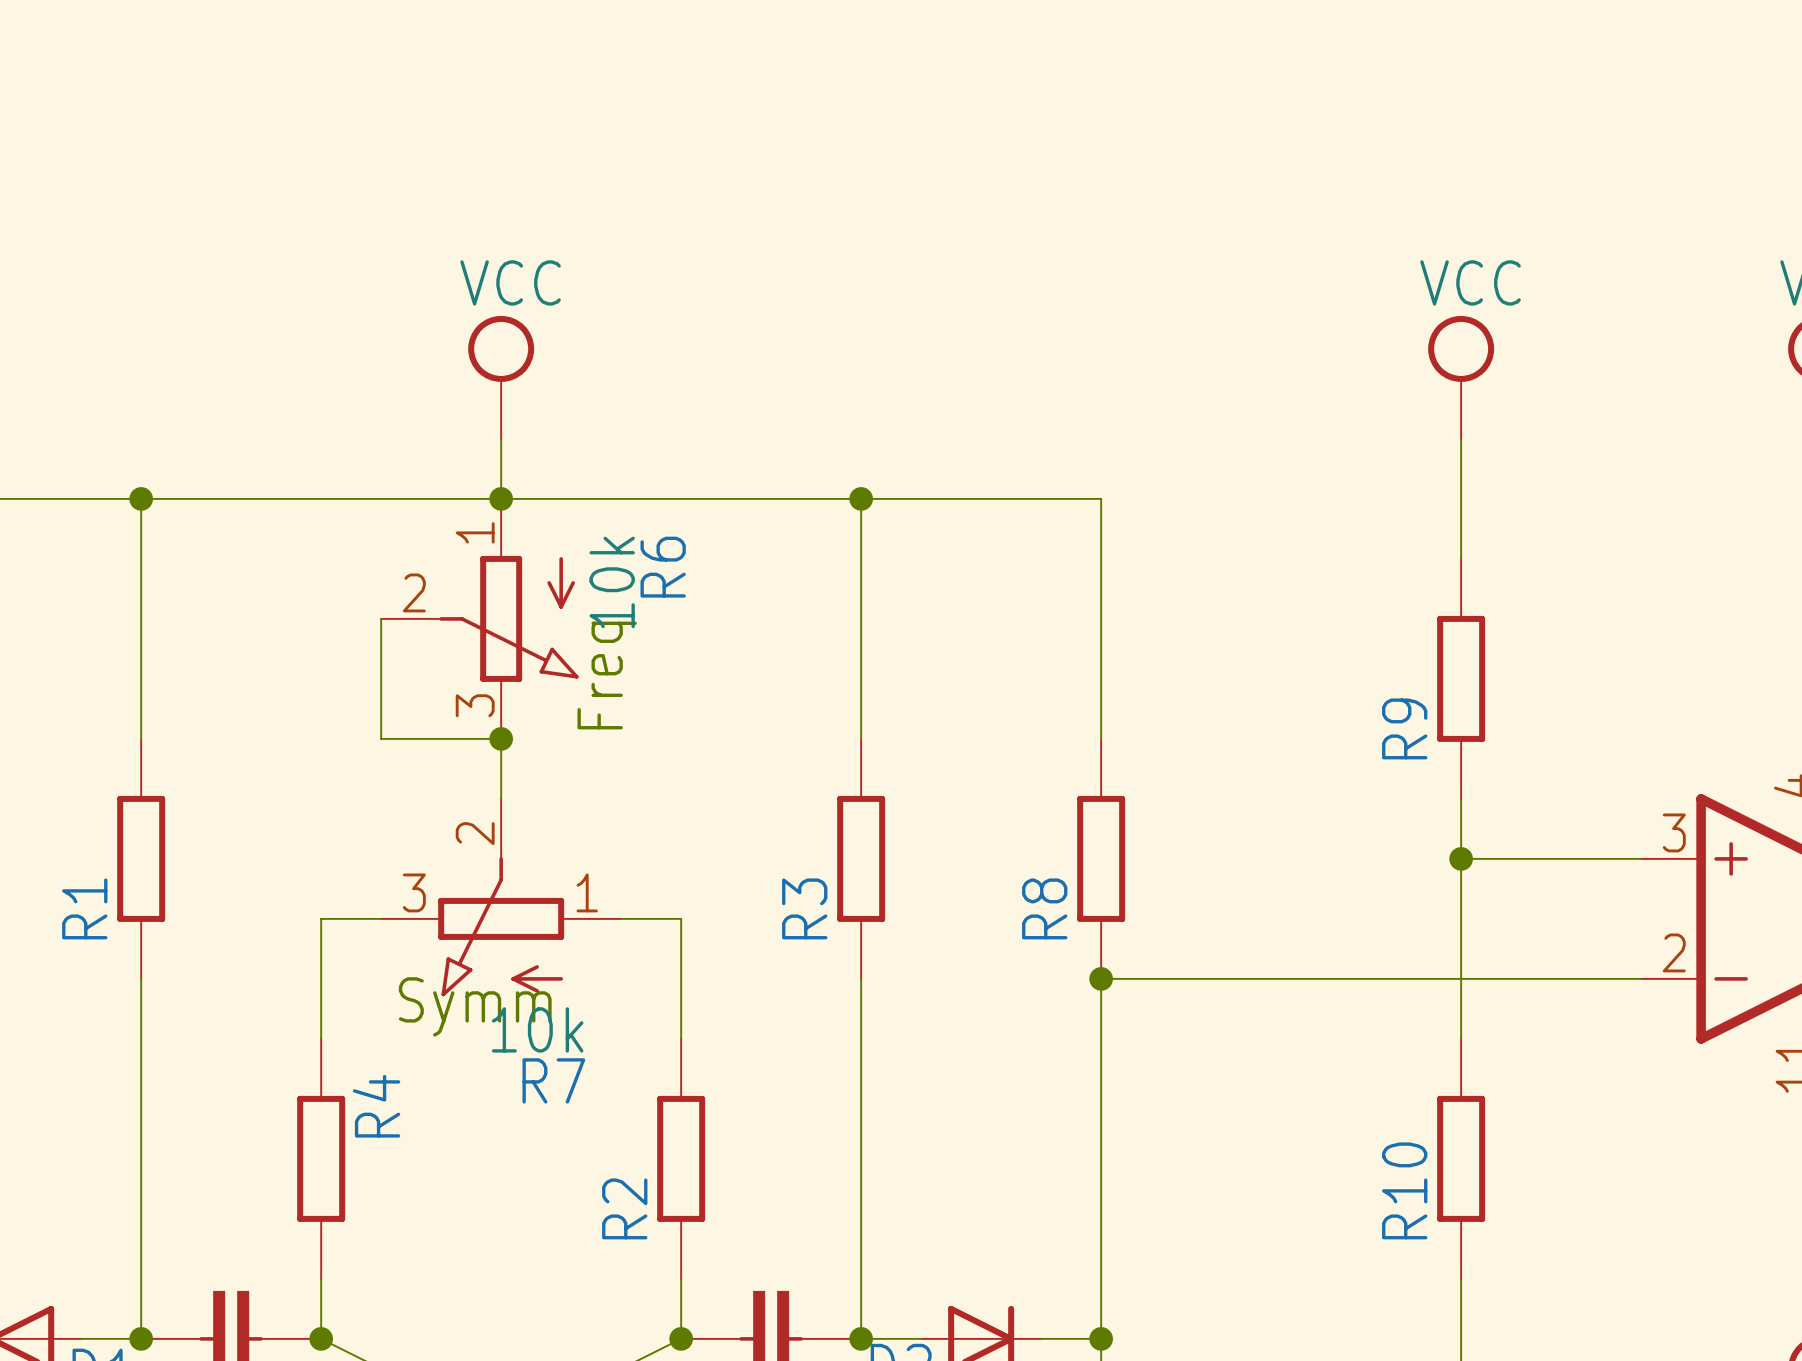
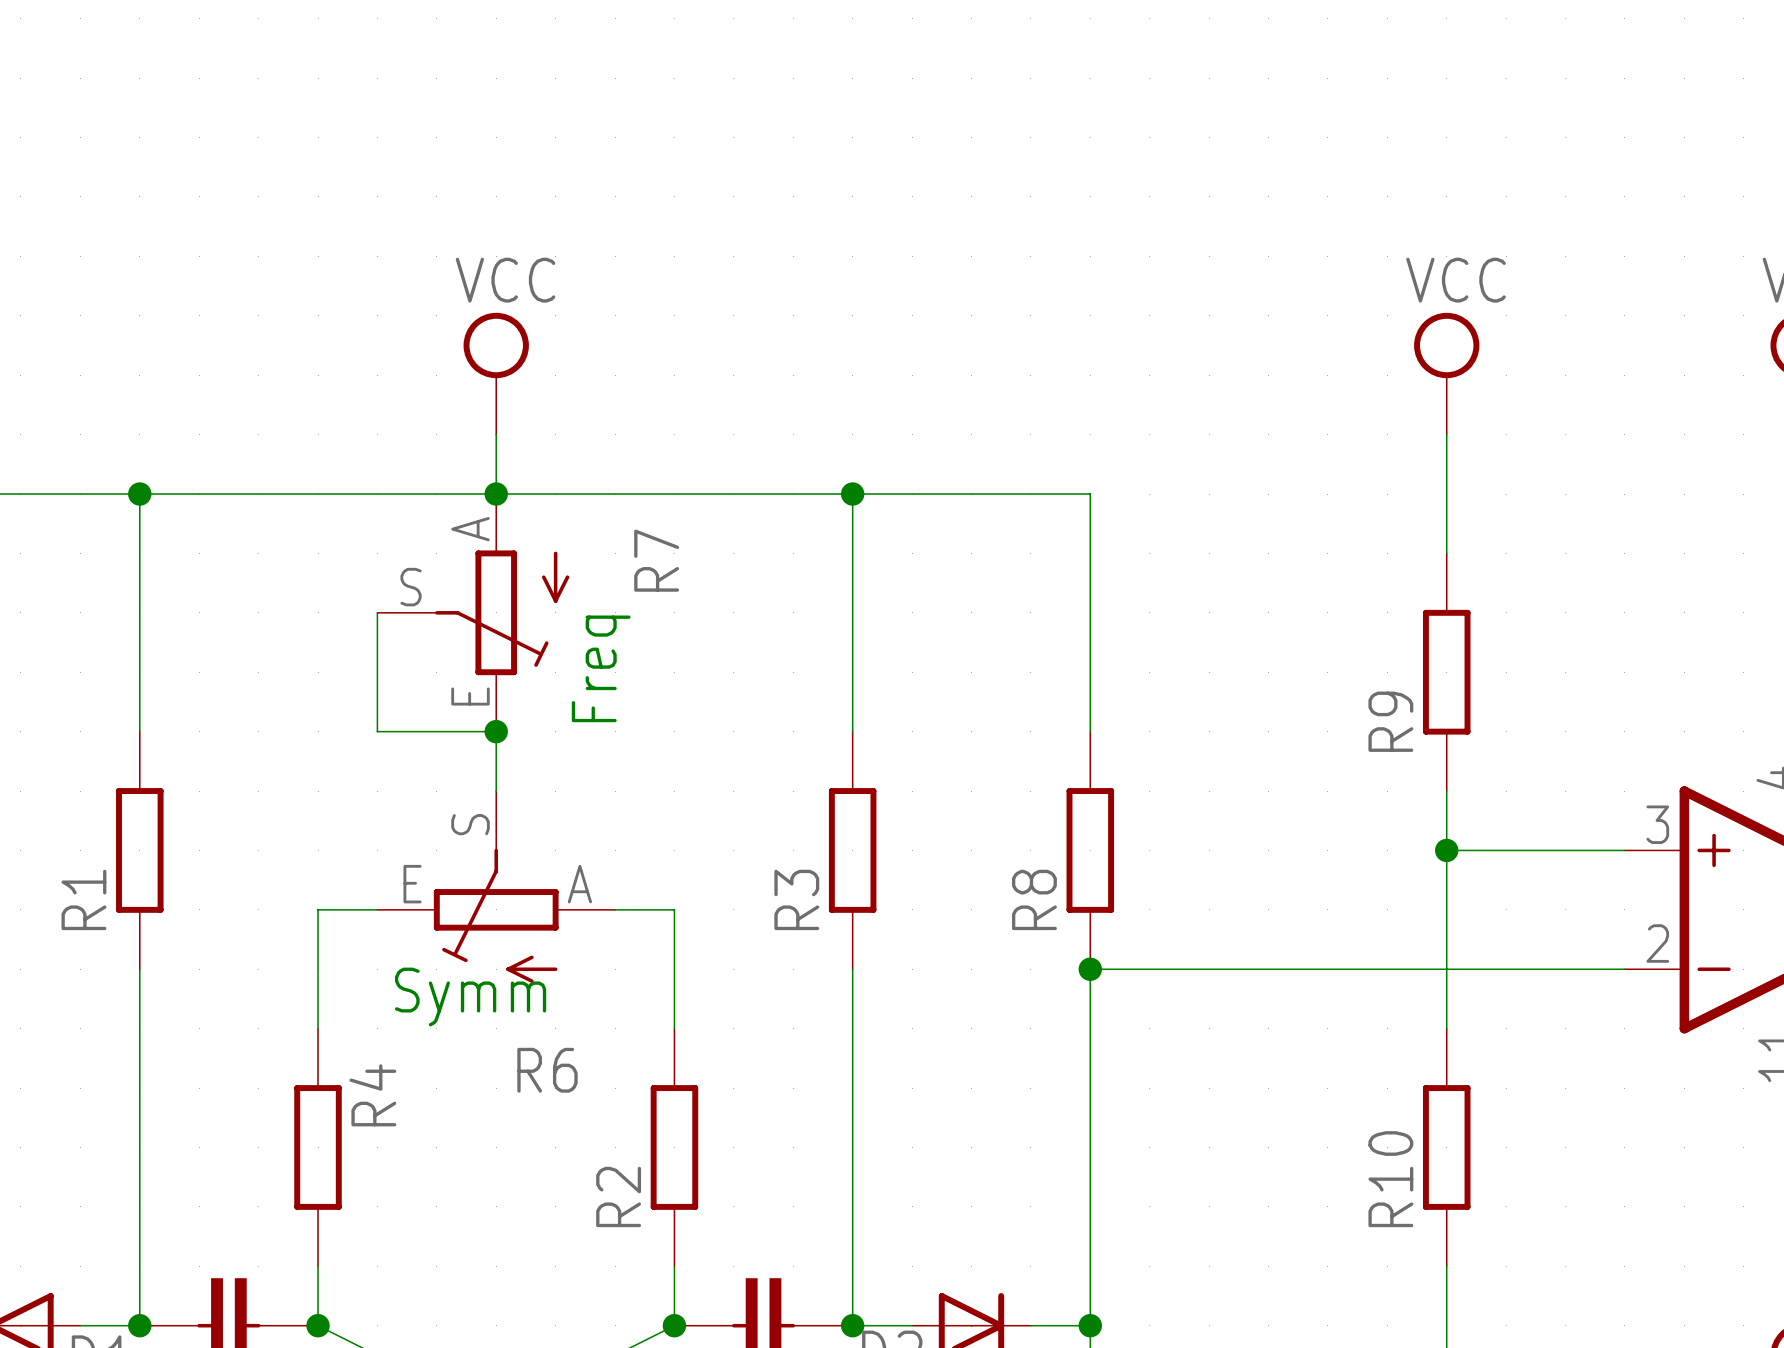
R6 symbol: [381, 498, 579, 739] -> [377, 791, 616, 983]
R6 name position: R6 (663, 567) -> R6 (547, 1070)
R6 value: 10k (612, 582) -> none
R7 symbol: [381, 798, 622, 997] -> [377, 494, 570, 732]
R7 value: 10k (537, 1029) -> none
R7 name position: R7 (553, 1080) -> R7 (656, 560)

